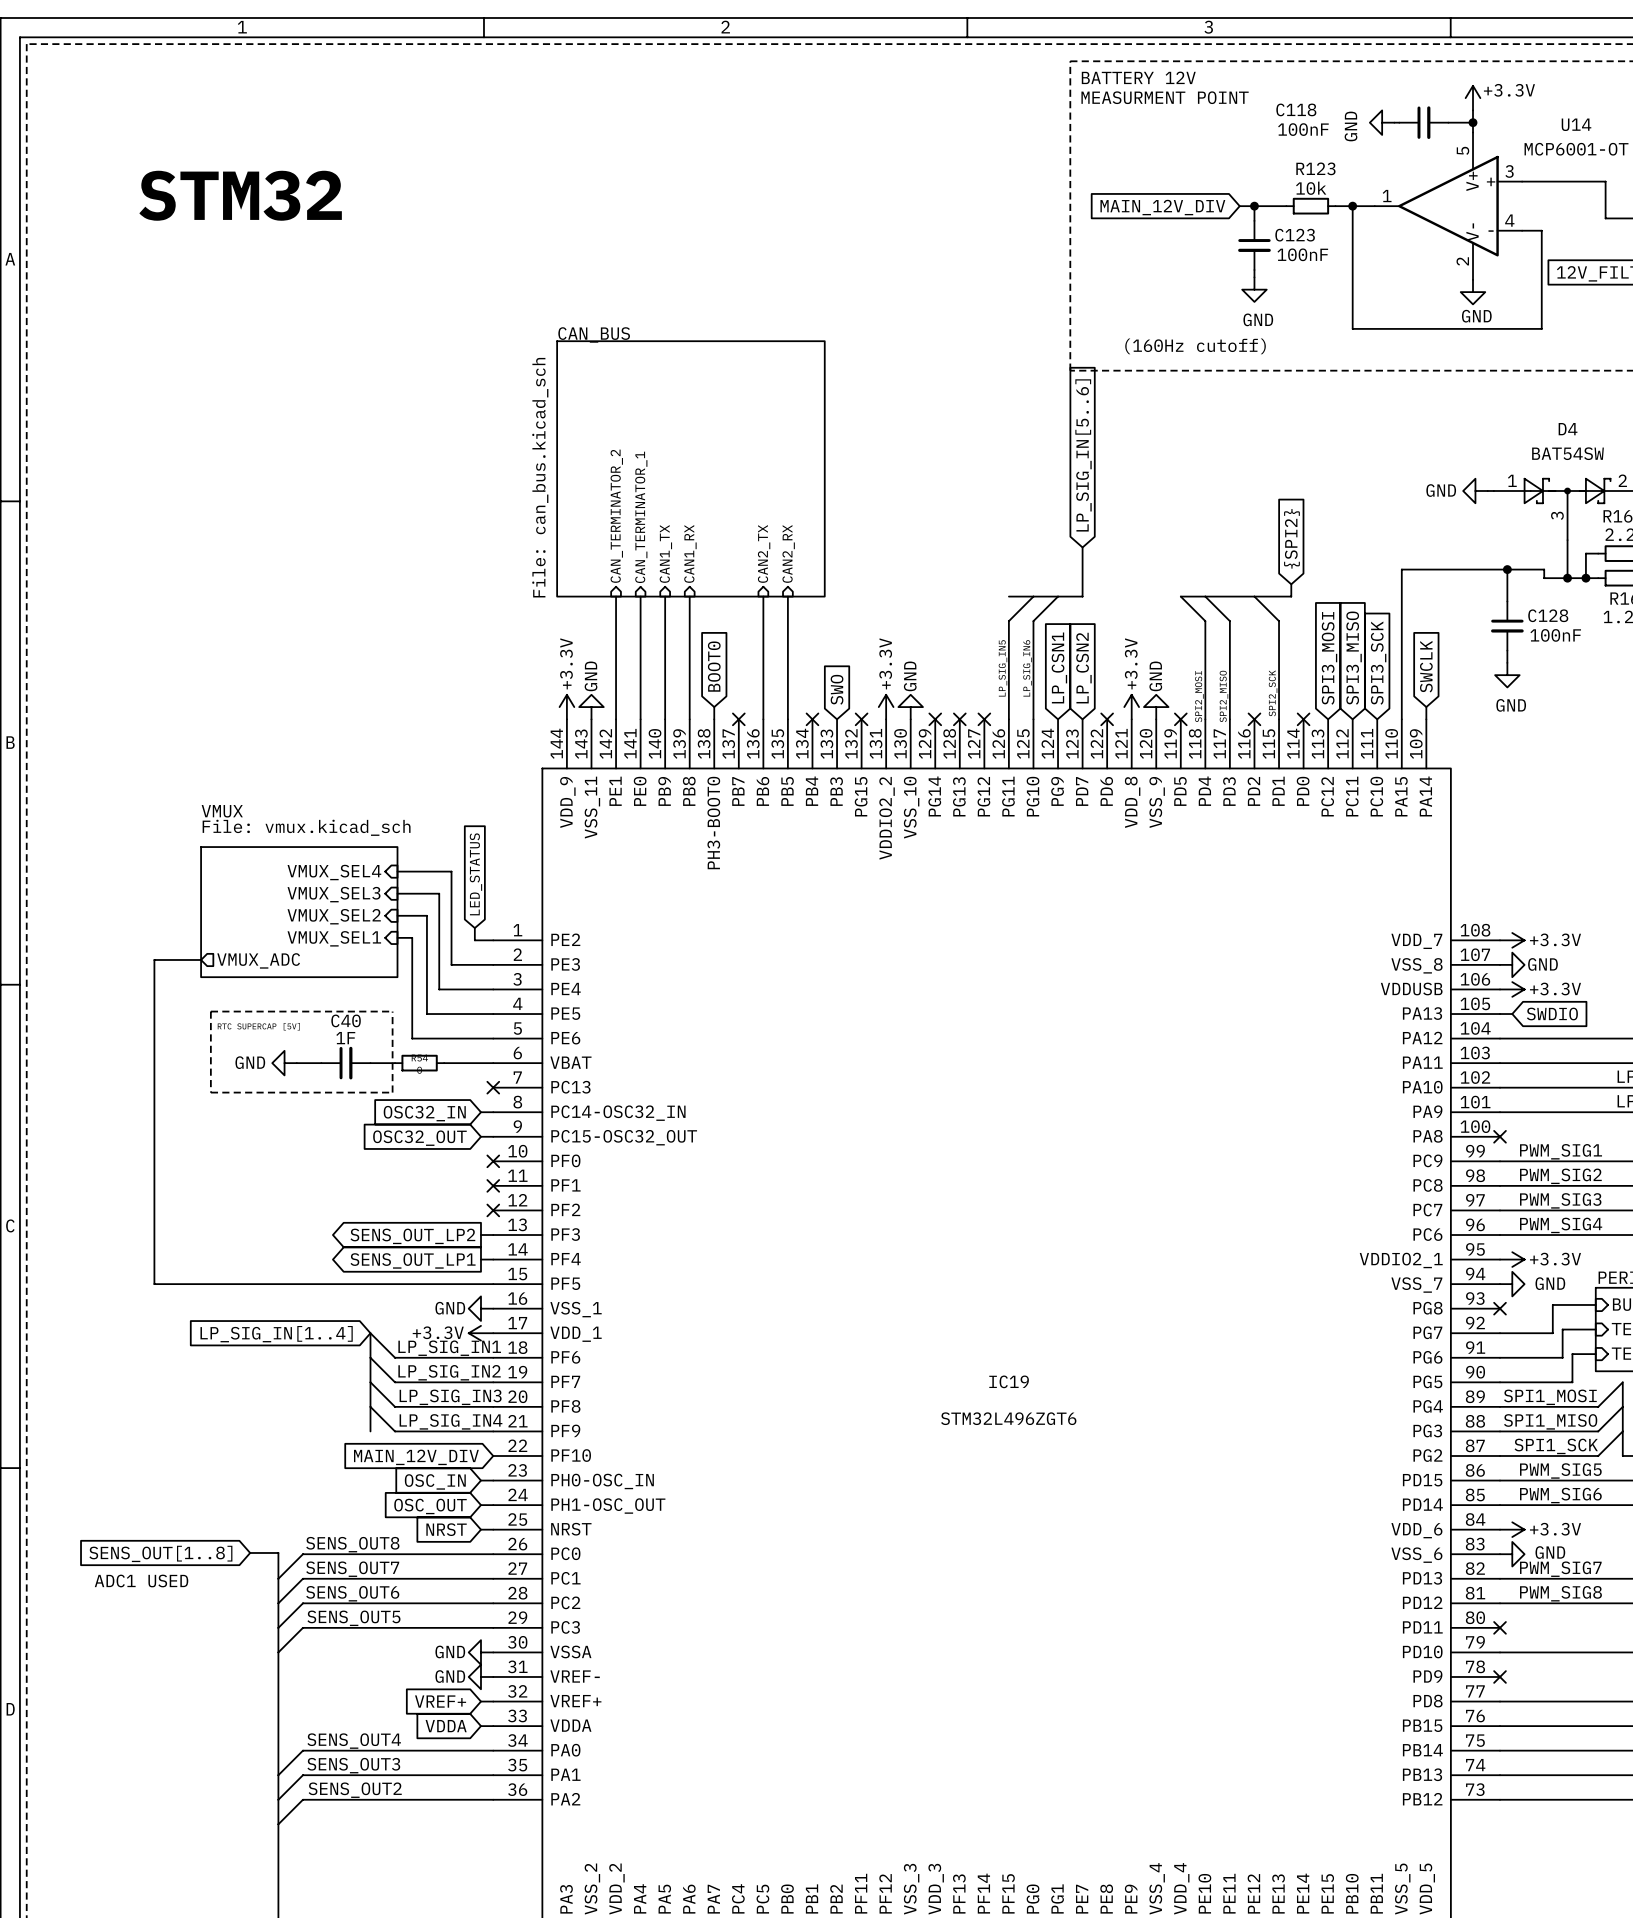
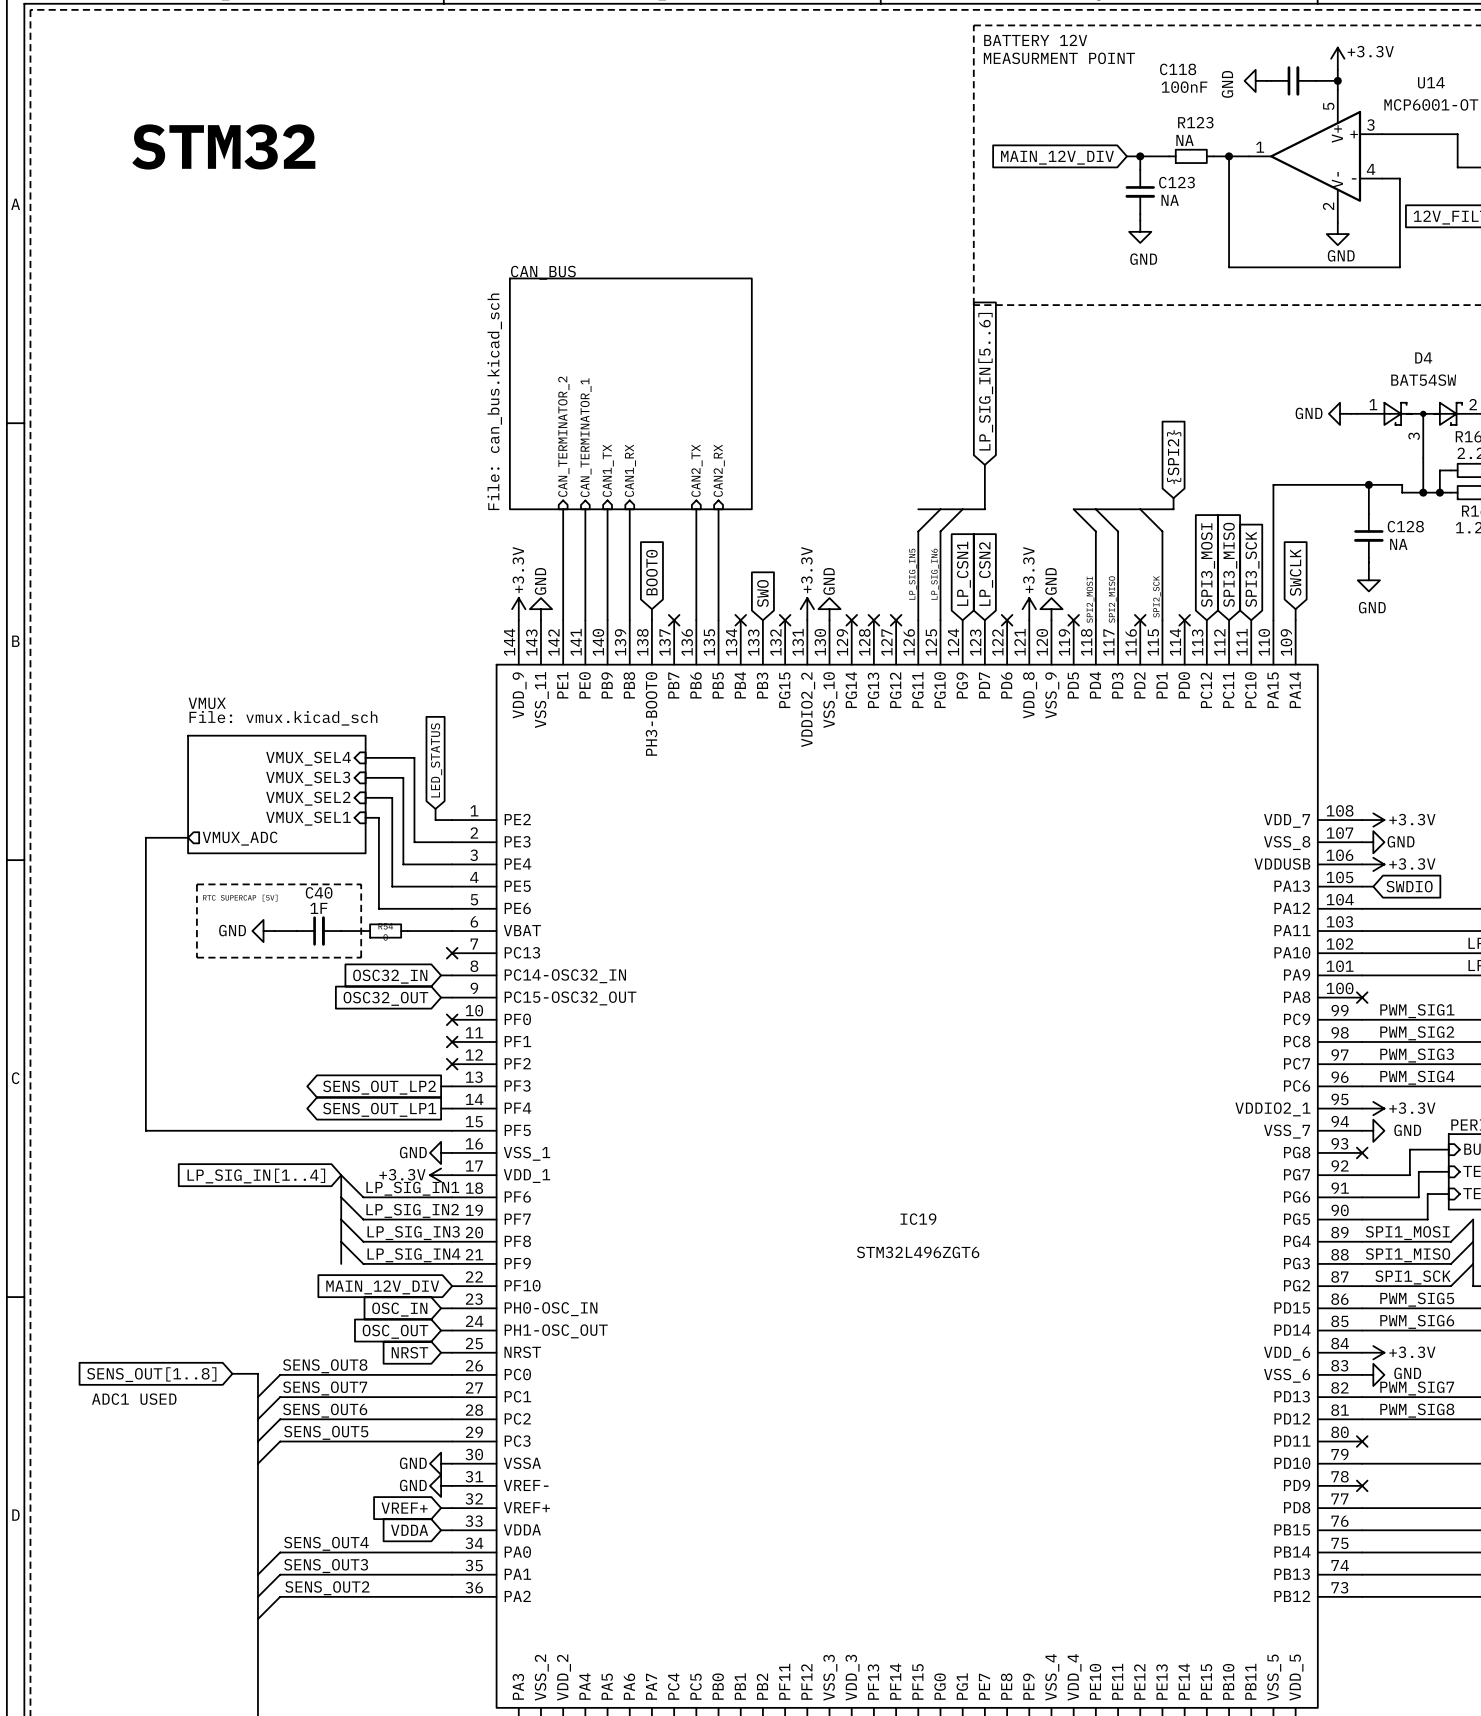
R123 value: 10k (1311, 188) -> NA (1185, 140)
C123 value: 100nF (1302, 254) -> NA (1170, 200)
text: (160Hz cutoff) (1195, 346) -> none
C128 value: 100nF (1555, 635) -> NA (1398, 544)

